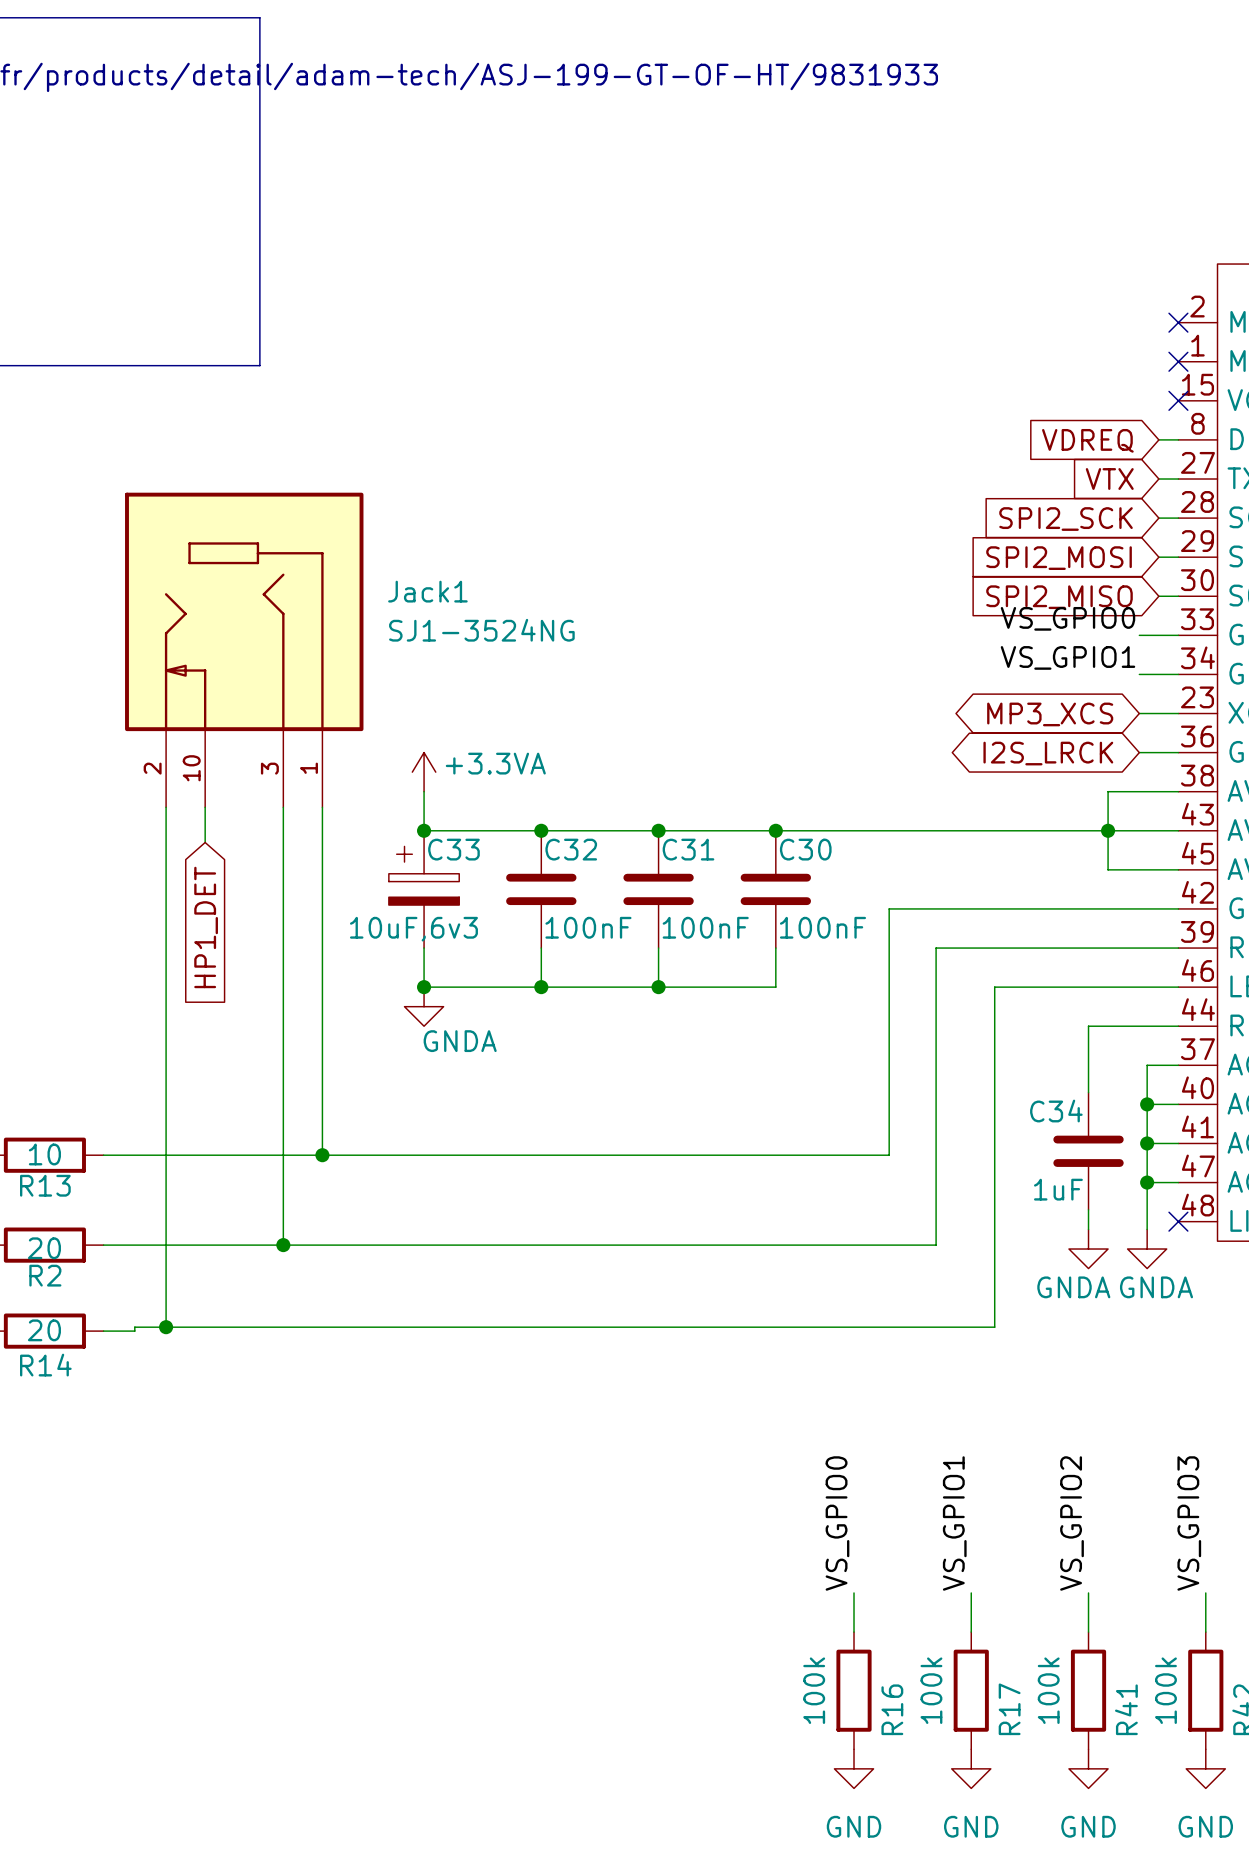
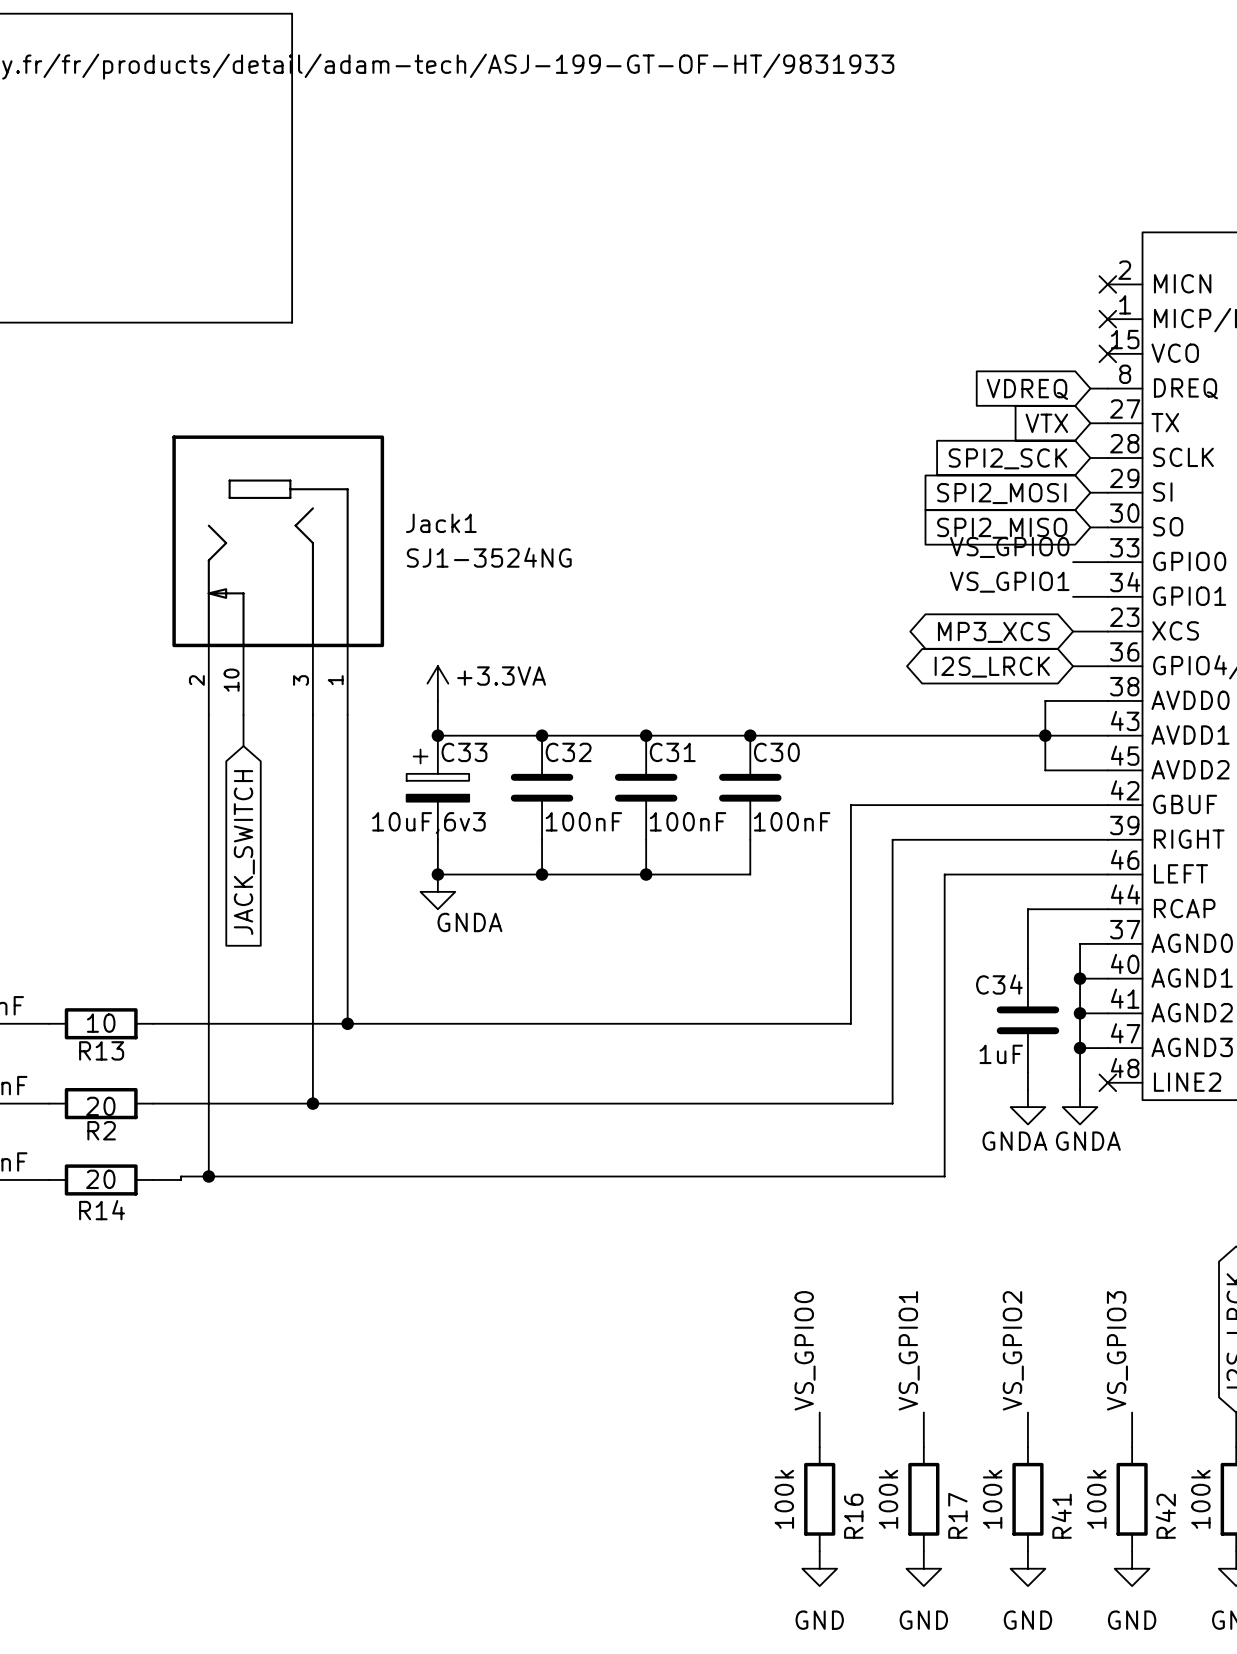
global label: HP1_DET (206, 927) -> JACK_SWITCH (244, 852)

